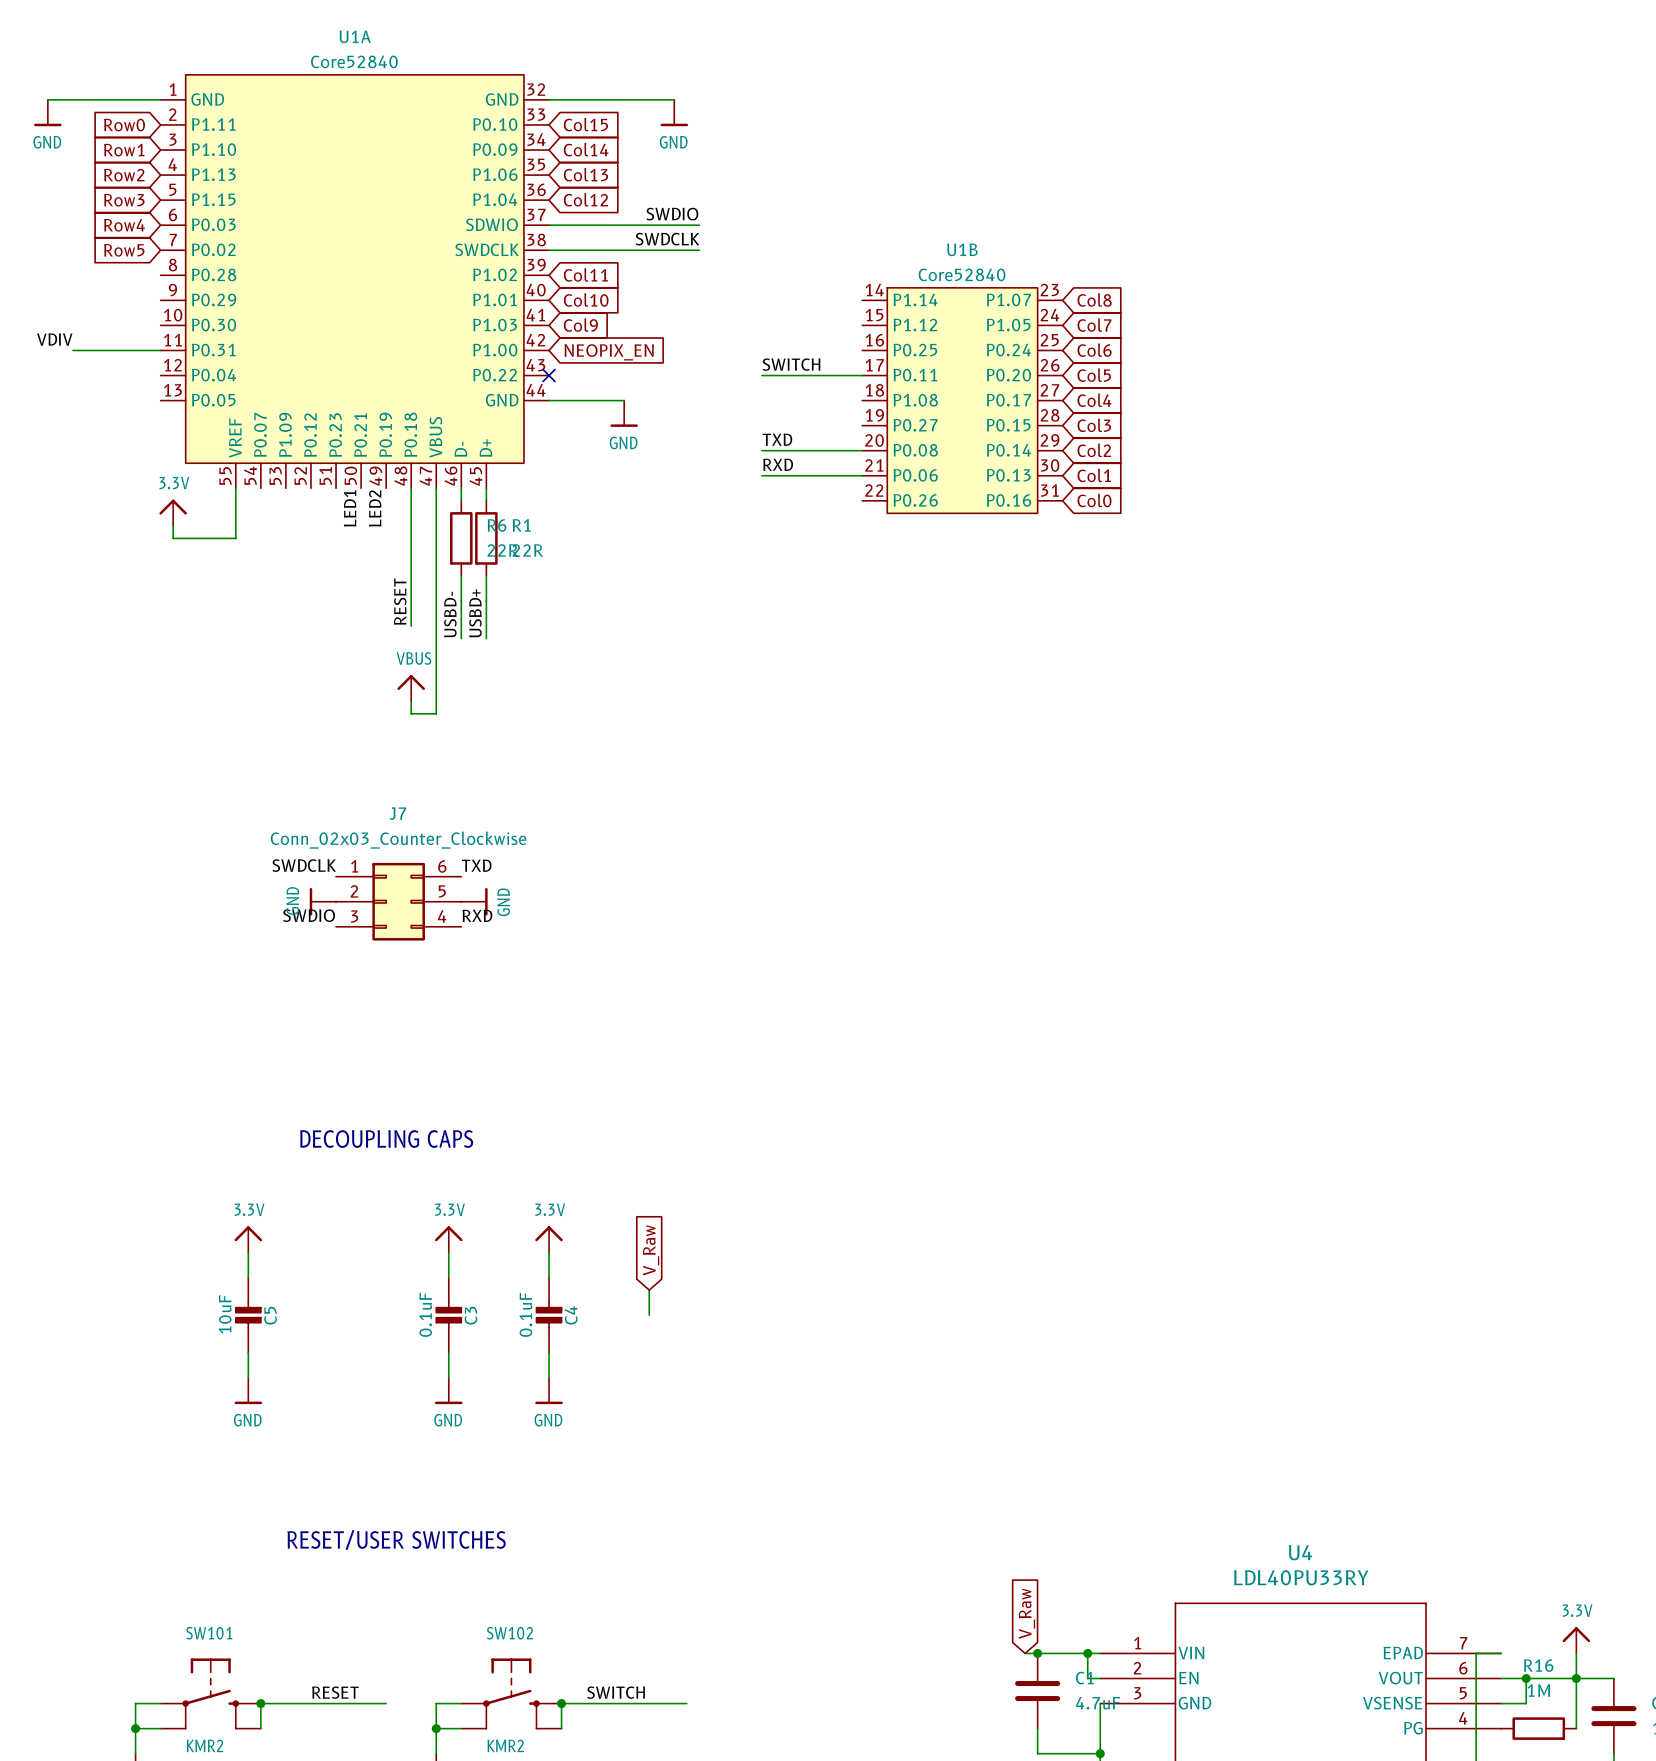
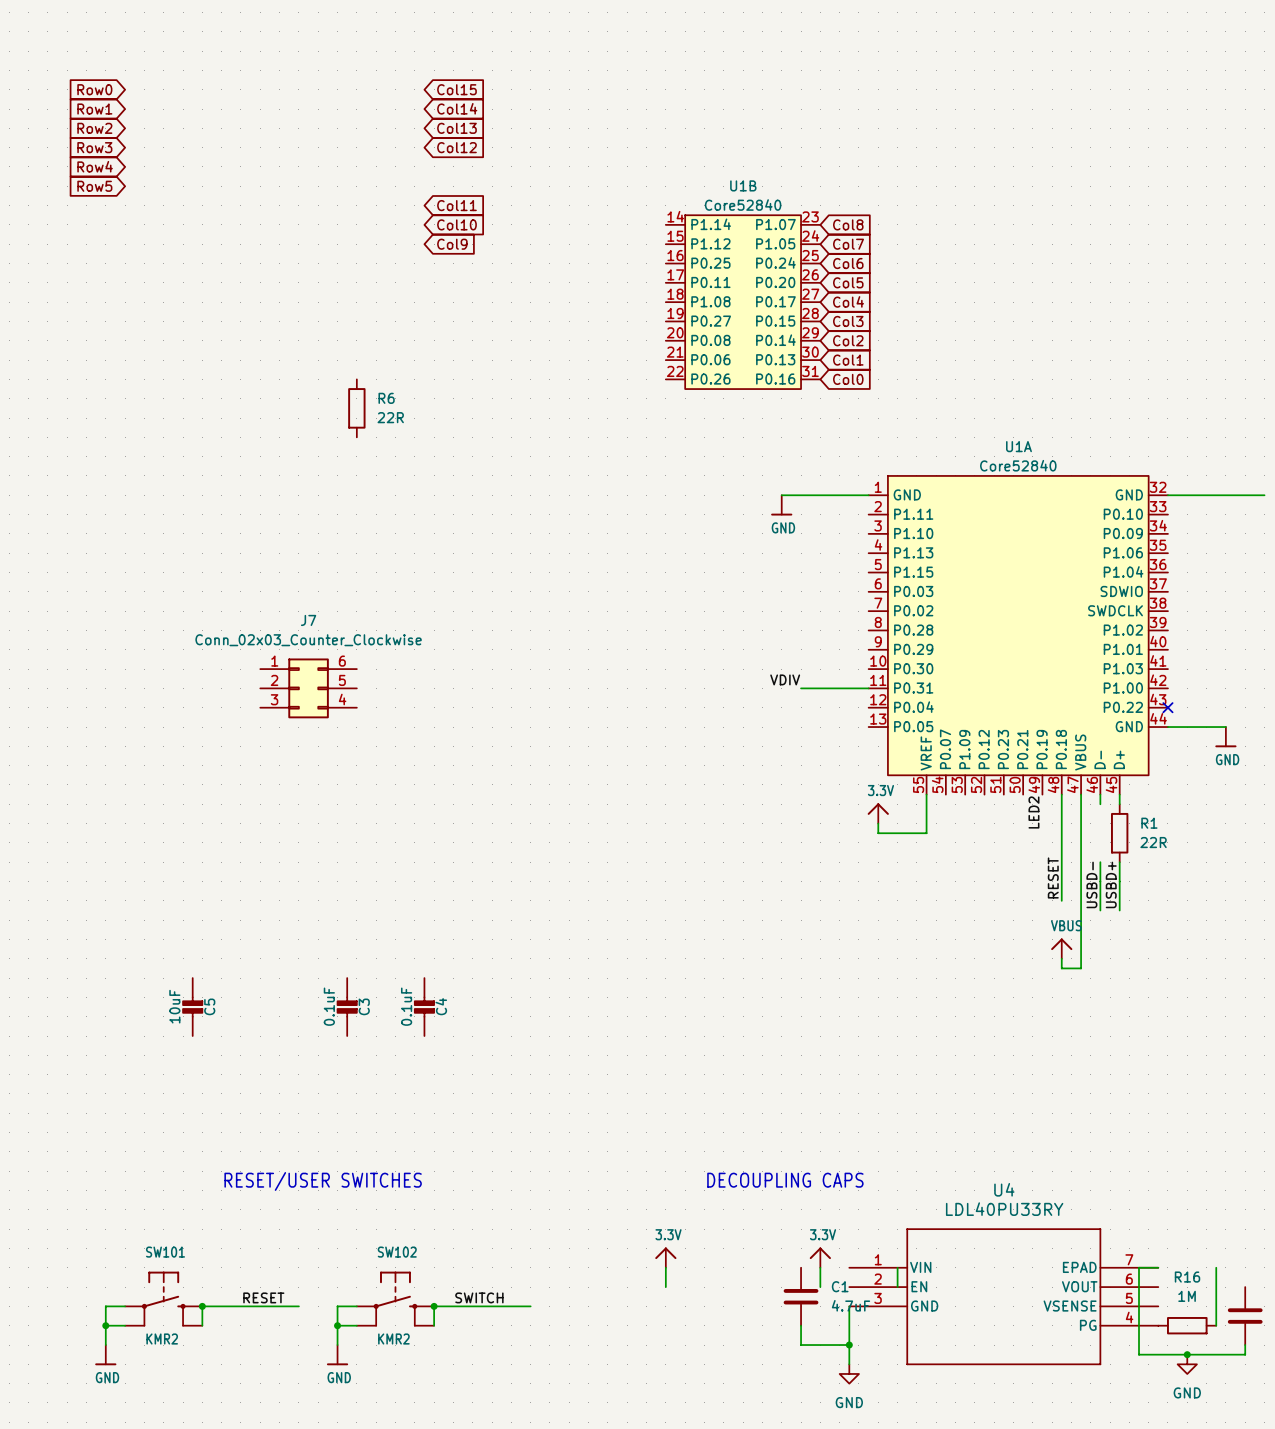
wire: (47, 99) (160, 99) -> none
wire: (549, 99) (674, 99) -> none
power symbol: GND (47, 113) -> none
power symbol: GND (674, 113) -> none
label: SWDIO (672, 214) -> none
wire: (549, 225) (699, 225) -> none
label: SWDCLK (667, 239) -> none
wire: (549, 250) (699, 250) -> none
U1A position: (354, 281) -> (1018, 635)
label: VDIV (54, 339) -> none
wire: (72, 350) (160, 350) -> none
global label: NEOPIX_EN (609, 352) -> none
label: SWITCH (791, 364) -> none
no-connect mark: (549, 375) -> none
wire: (762, 375) (862, 375) -> none
wire: (549, 400) (624, 400) -> none
power symbol: GND (624, 413) -> none
label: TXD (777, 439) -> none
wire: (762, 450) (862, 450) -> none
label: RXD (778, 464) -> none
wire: (762, 475) (862, 475) -> none
wire: (235, 488) (235, 538) (173, 538) (173, 525) -> none
wire: (411, 488) (411, 626) -> none
wire: (436, 488) (436, 713) (411, 713) (411, 701) -> none
wire: (461, 488) (461, 500) -> none
wire: (486, 488) (486, 500) -> none
label: LED1 (350, 508) -> none
label: LED2 (375, 508) -> none
power symbol: 3.3V (173, 512) -> none
R1 position: (486, 538) -> (1119, 833)
wire: (461, 575) (461, 638) -> none
wire: (486, 575) (486, 638) -> none
label: RESET (400, 601) -> none
label: USBD+ (475, 613) -> none
label: USBD- (450, 614) -> none
wire: none -> (781, 495) (868, 495)
wire: none -> (1167, 495) (1264, 495)
power symbol: none -> GND (781, 505)
power symbol: VBUS (411, 688) -> none
label: SWDCLK (304, 865) -> none
label: TXD (476, 865) -> none
label: none -> VDIV (785, 679)
power symbol: GND (322, 901) -> none
power symbol: GND (474, 901) -> none
wire: none -> (801, 688) (868, 688)
label: SWDIO (309, 915) -> none
label: RXD (477, 915) -> none
no-connect mark: none -> (1167, 707)
wire: none -> (1167, 727) (1225, 727)
power symbol: none -> GND (1225, 737)
wire: none -> (926, 794) (926, 833) (878, 833) (878, 823)
wire: none -> (1061, 794) (1061, 900)
wire: none -> (1081, 794) (1081, 968) (1061, 968) (1061, 958)
wire: none -> (1100, 794) (1100, 804)
wire: none -> (1119, 794) (1119, 804)
label: none -> LED2 (1033, 812)
power symbol: none -> 3.3V (878, 813)
wire: none -> (1100, 862) (1100, 910)
wire: none -> (1119, 862) (1119, 910)
text: DECOUPLING CAPS (386, 1139) -> none
label: none -> RESET (1053, 877)
label: none -> USBD+ (1111, 884)
label: none -> USBD- (1091, 884)
power symbol: 3.3V (248, 1239) -> none
power symbol: 3.3V (448, 1239) -> none
power symbol: 3.3V (549, 1239) -> none
power symbol: none -> VBUS (1061, 948)
global label: V_Raw (651, 1250) -> none
wire: (248, 1252) (248, 1277) -> none
wire: (448, 1252) (448, 1277) -> none
wire: (549, 1252) (549, 1277) -> none
wire: (649, 1290) (649, 1315) -> none
wire: (248, 1352) (248, 1377) -> none
wire: (448, 1352) (448, 1377) -> none
wire: (549, 1352) (549, 1377) -> none
power symbol: GND (248, 1390) -> none
power symbol: GND (448, 1390) -> none
power symbol: GND (549, 1390) -> none
text: none -> DECOUPLING CAPS (785, 1180)
global label: V_Raw (1026, 1613) -> none
power symbol: none -> 3.3V (665, 1257)
power symbol: none -> 3.3V (820, 1257)
power symbol: 3.3V (1576, 1640) -> none
wire: none -> (665, 1267) (665, 1287)
wire: (1025, 1653) (1100, 1653) -> none
junction: (1037, 1653) -> none
wire: none -> (820, 1267) (820, 1287)
wire: (1087, 1653) (1087, 1678) (1100, 1678) -> none
junction: (1087, 1653) -> none
wire: none -> (897, 1267) (897, 1287)
wire: (1501, 1678) (1613, 1678) -> none
wire: (1526, 1678) (1526, 1703) (1501, 1703) -> none
junction: (1526, 1678) -> none
junction: (1576, 1678) -> none

